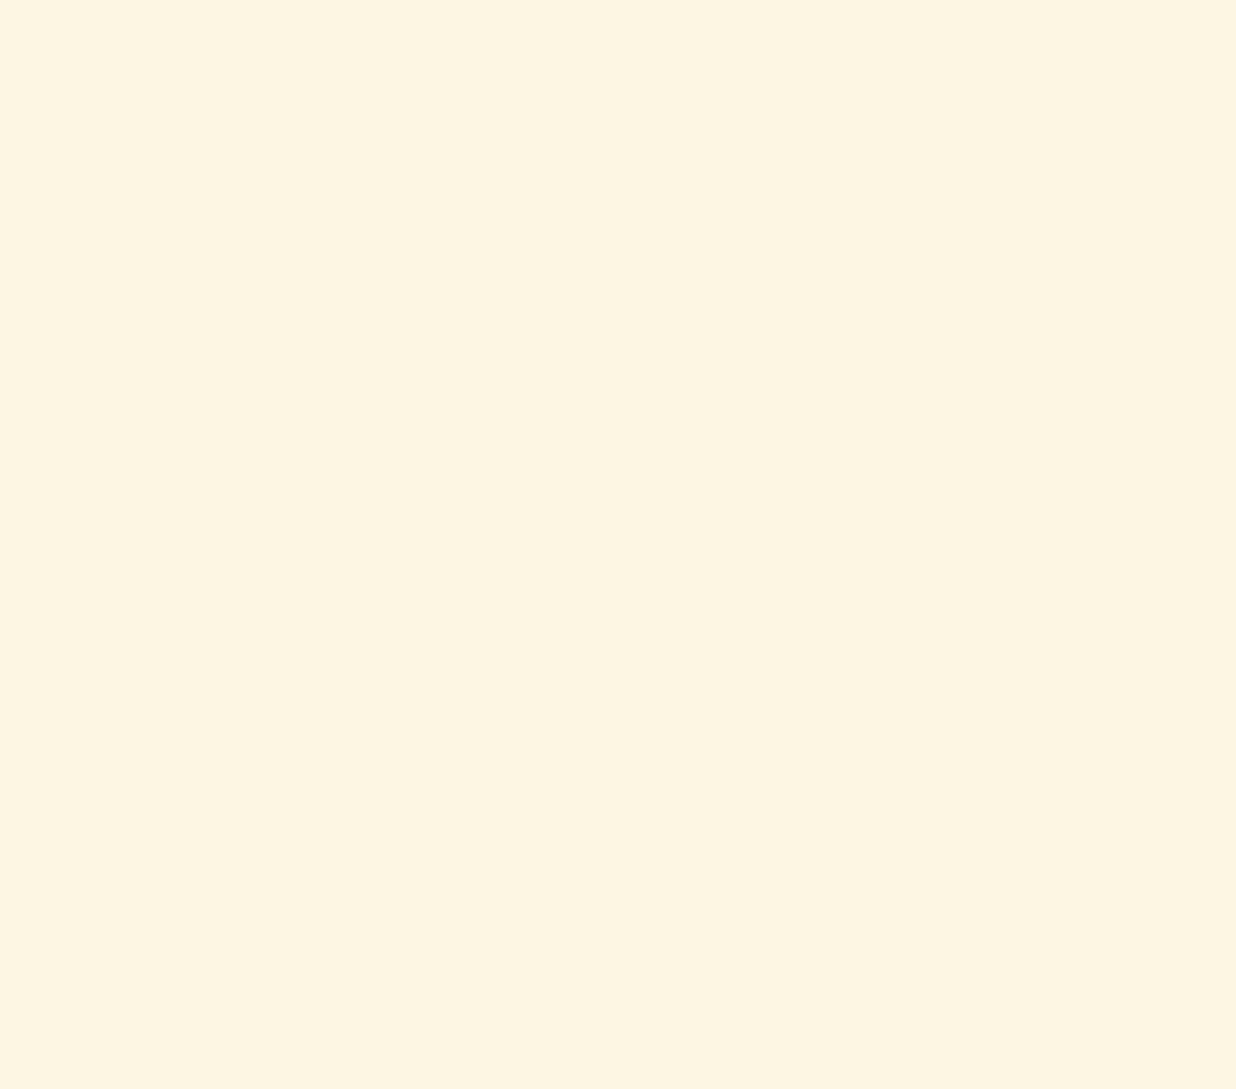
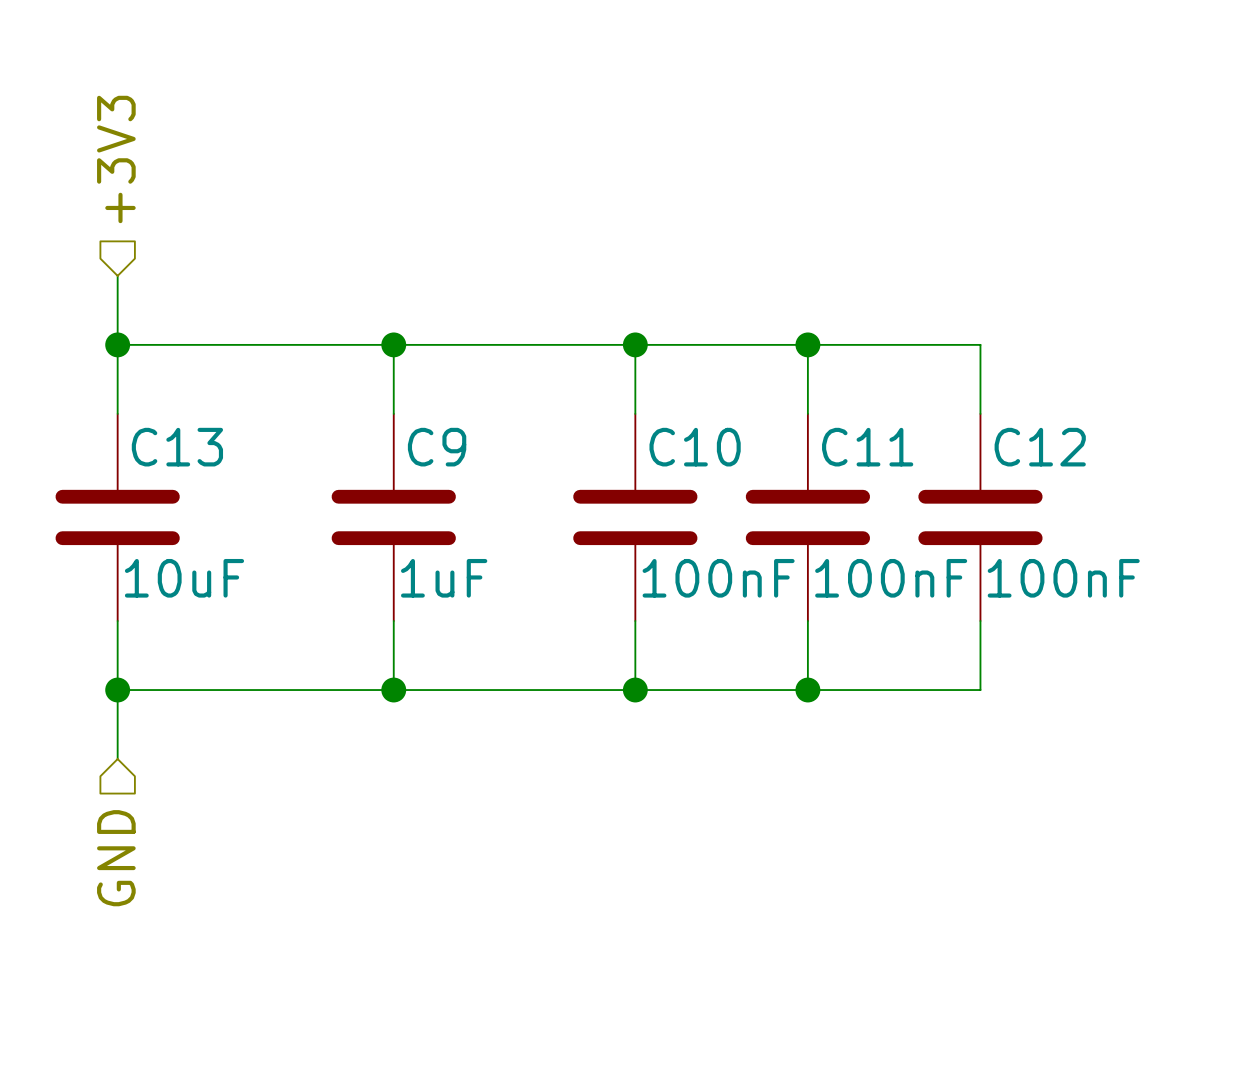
hierarchical label: none -> +3V3 (116, 159)
wire: none -> (117, 275) (117, 413)
wire: none -> (117, 344) (980, 344) (980, 413)
junction: none -> (117, 344)
wire: none -> (393, 344) (393, 413)
junction: none -> (393, 344)
wire: none -> (635, 344) (635, 413)
junction: none -> (635, 344)
wire: none -> (807, 344) (807, 413)
junction: none -> (807, 344)
C13: none -> 10uF (117, 517)
C9: none -> 1uF (393, 517)
C10: none -> 100nF (635, 517)
C11: none -> 100nF (807, 517)
C12: none -> 100nF (980, 517)
wire: none -> (117, 621) (117, 759)
wire: none -> (393, 621) (393, 690)
wire: none -> (635, 621) (635, 690)
wire: none -> (807, 621) (807, 690)
wire: none -> (980, 621) (980, 690) (117, 690)
junction: none -> (117, 690)
junction: none -> (393, 690)
junction: none -> (635, 690)
junction: none -> (807, 690)
hierarchical label: none -> GND (116, 858)

